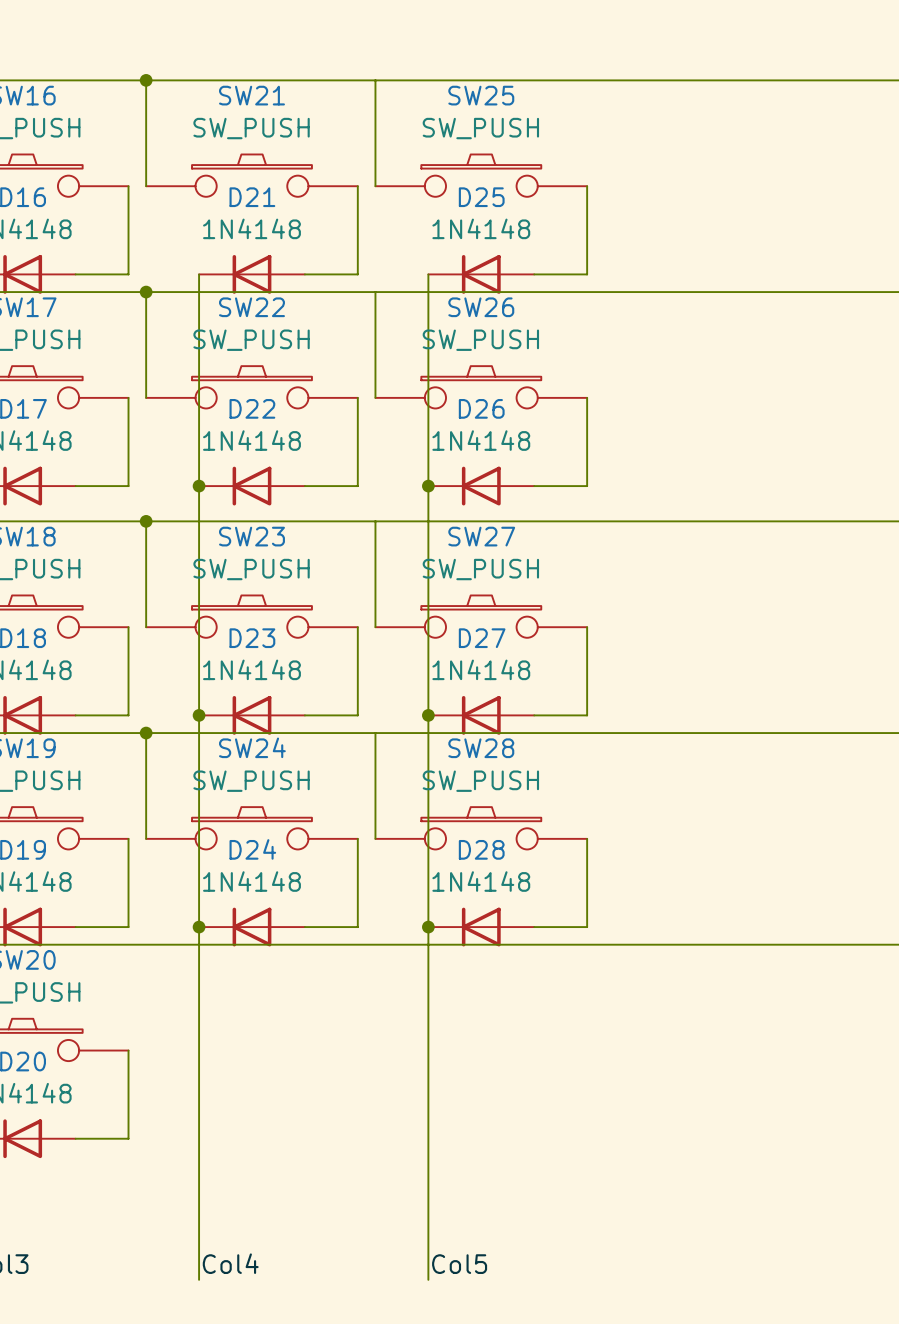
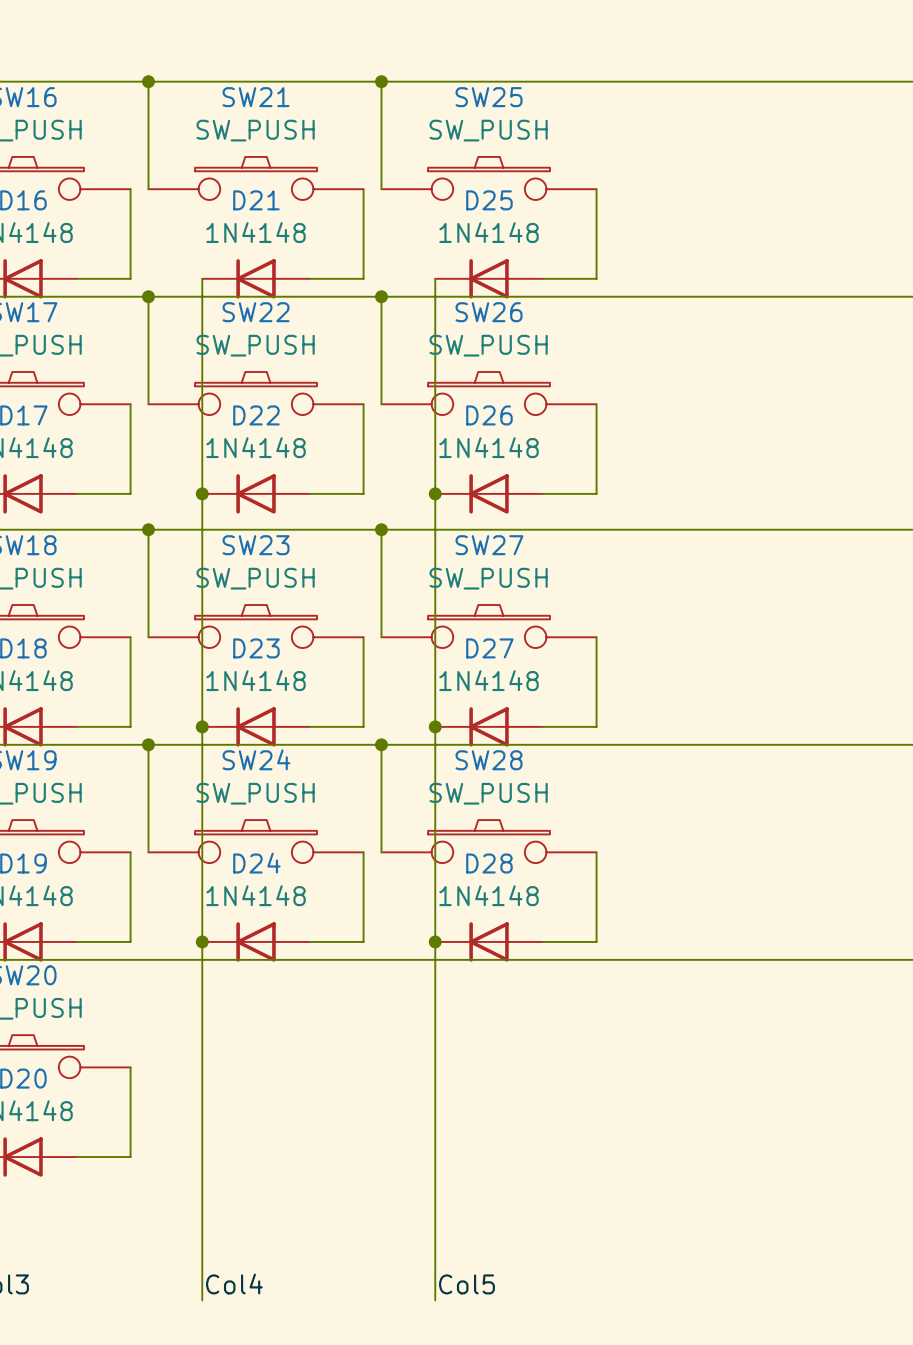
junction: none -> (381, 81)
junction: none -> (381, 296)
junction: none -> (381, 529)
junction: none -> (381, 744)

